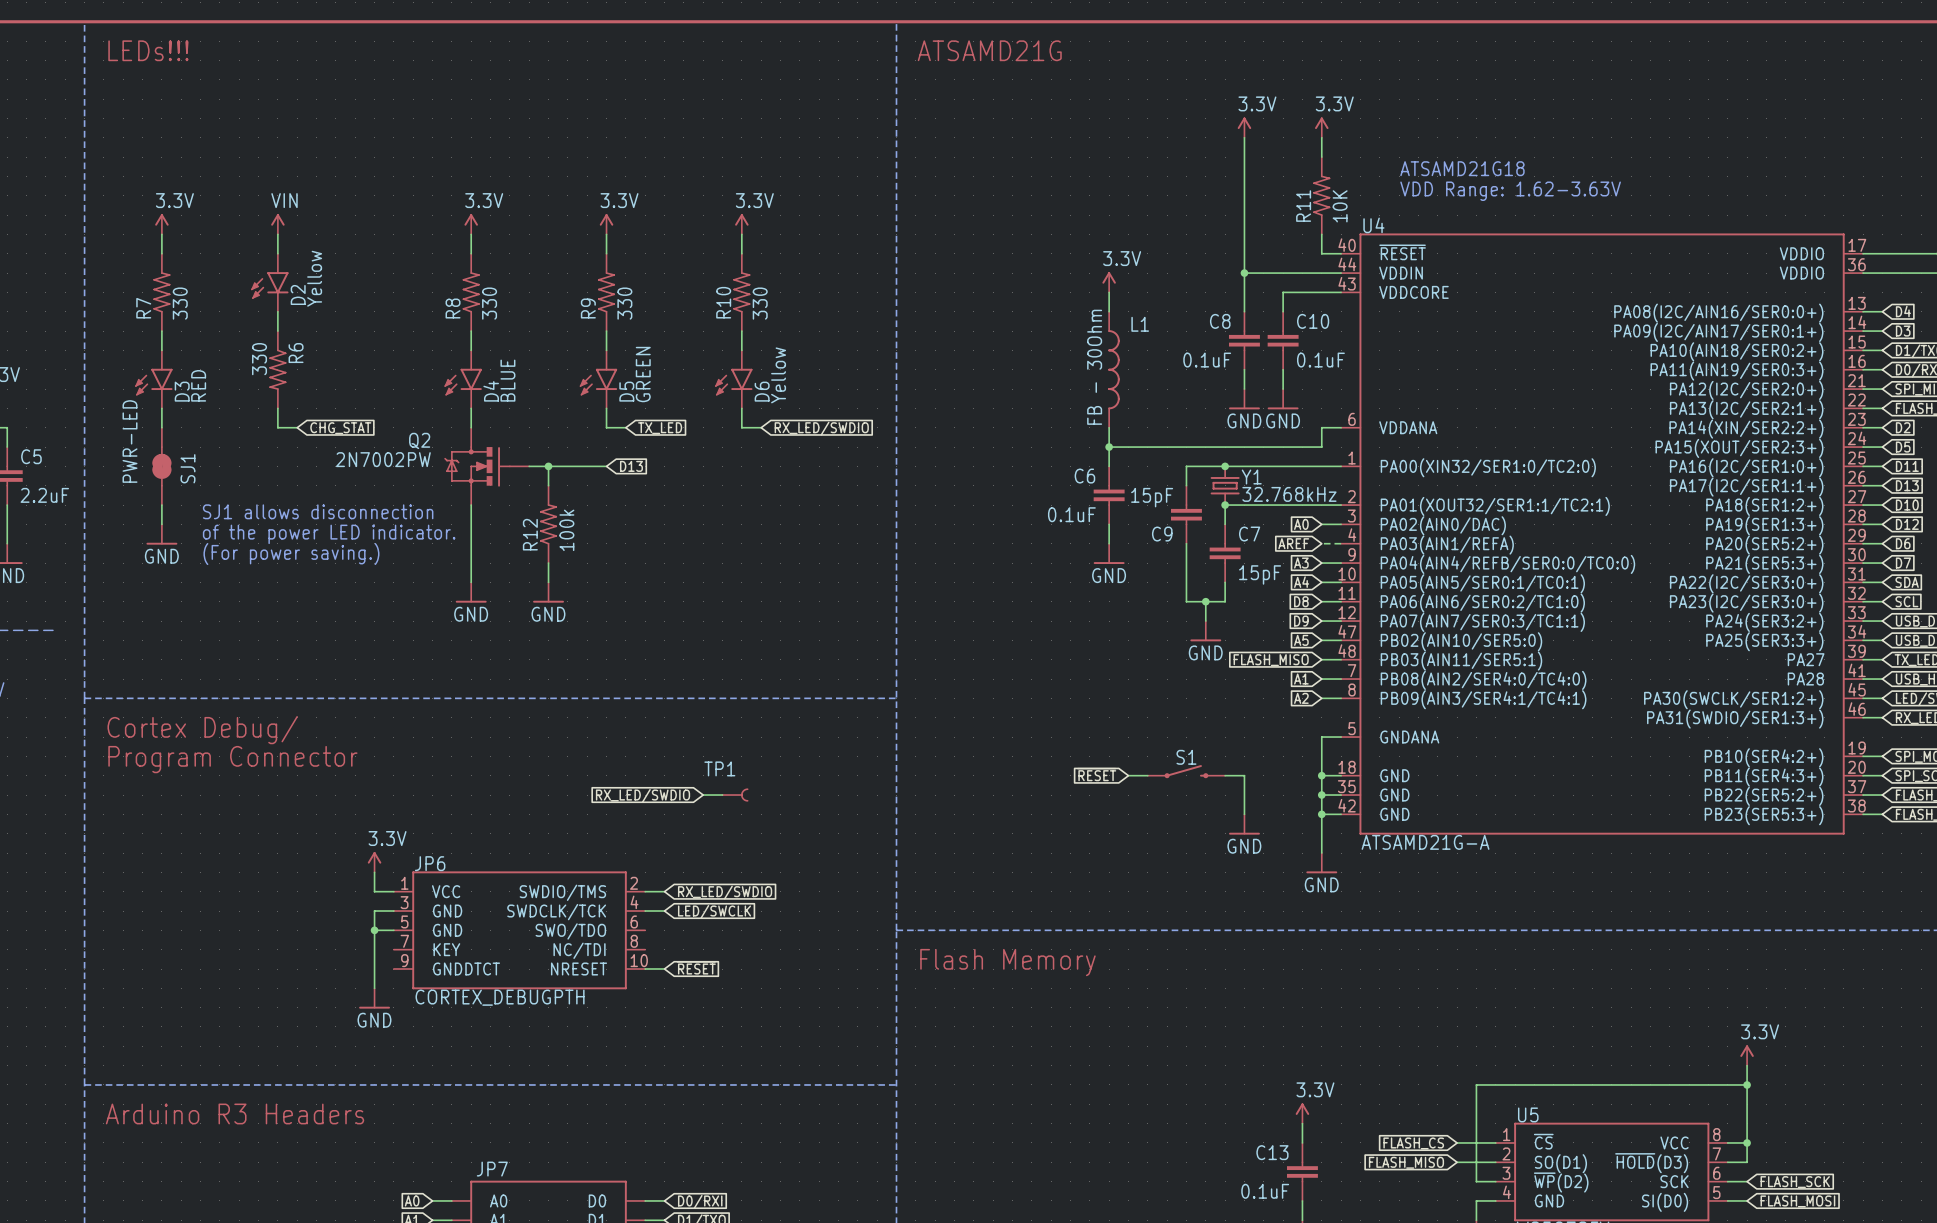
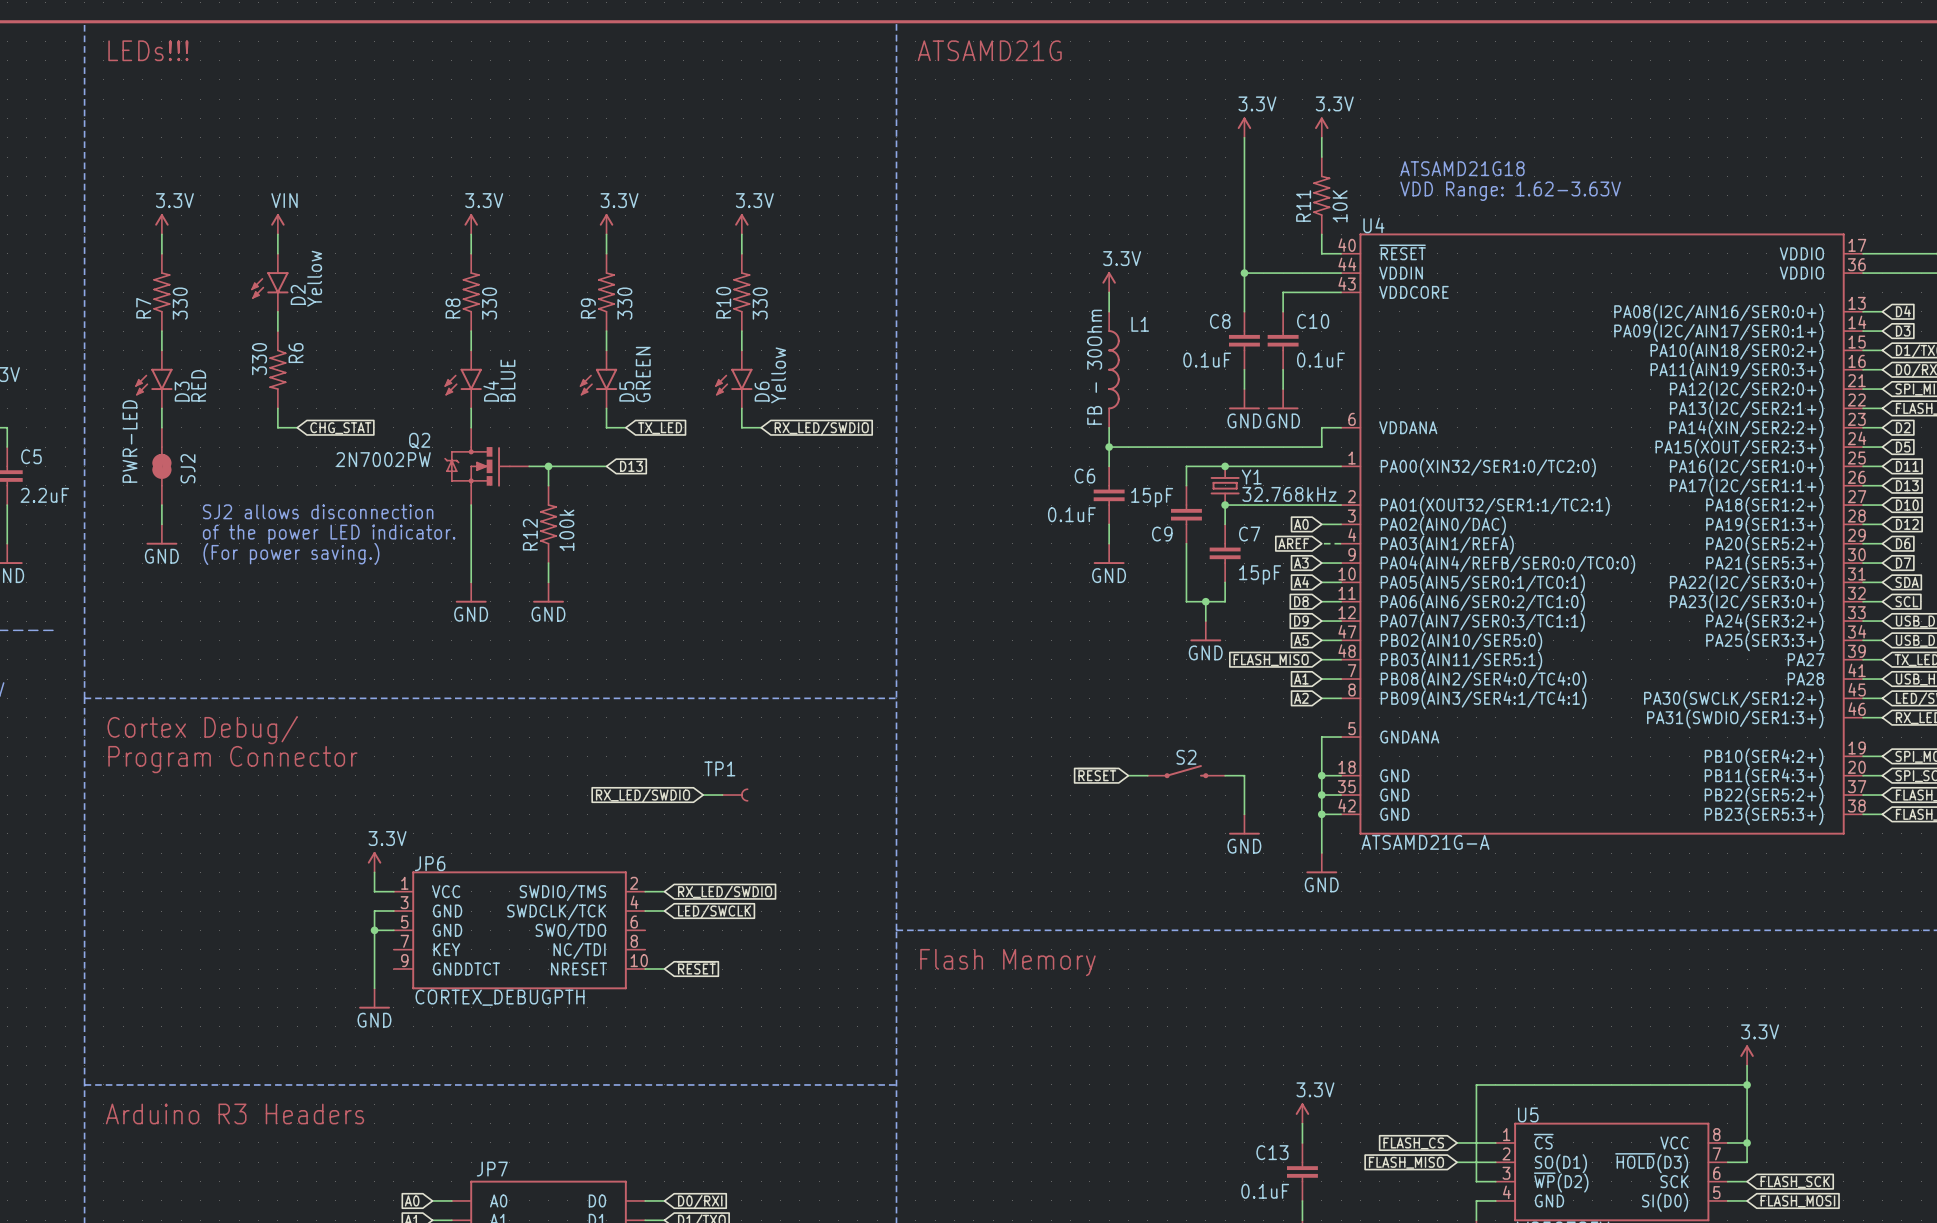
SJ1 name: SJ1 (188, 468) -> SJ2 (188, 468)
text: SJ1 allows disconnection (318, 511) -> SJ2 allows disconnection (318, 511)
S1 name: S1 (1186, 757) -> S2 (1186, 757)

